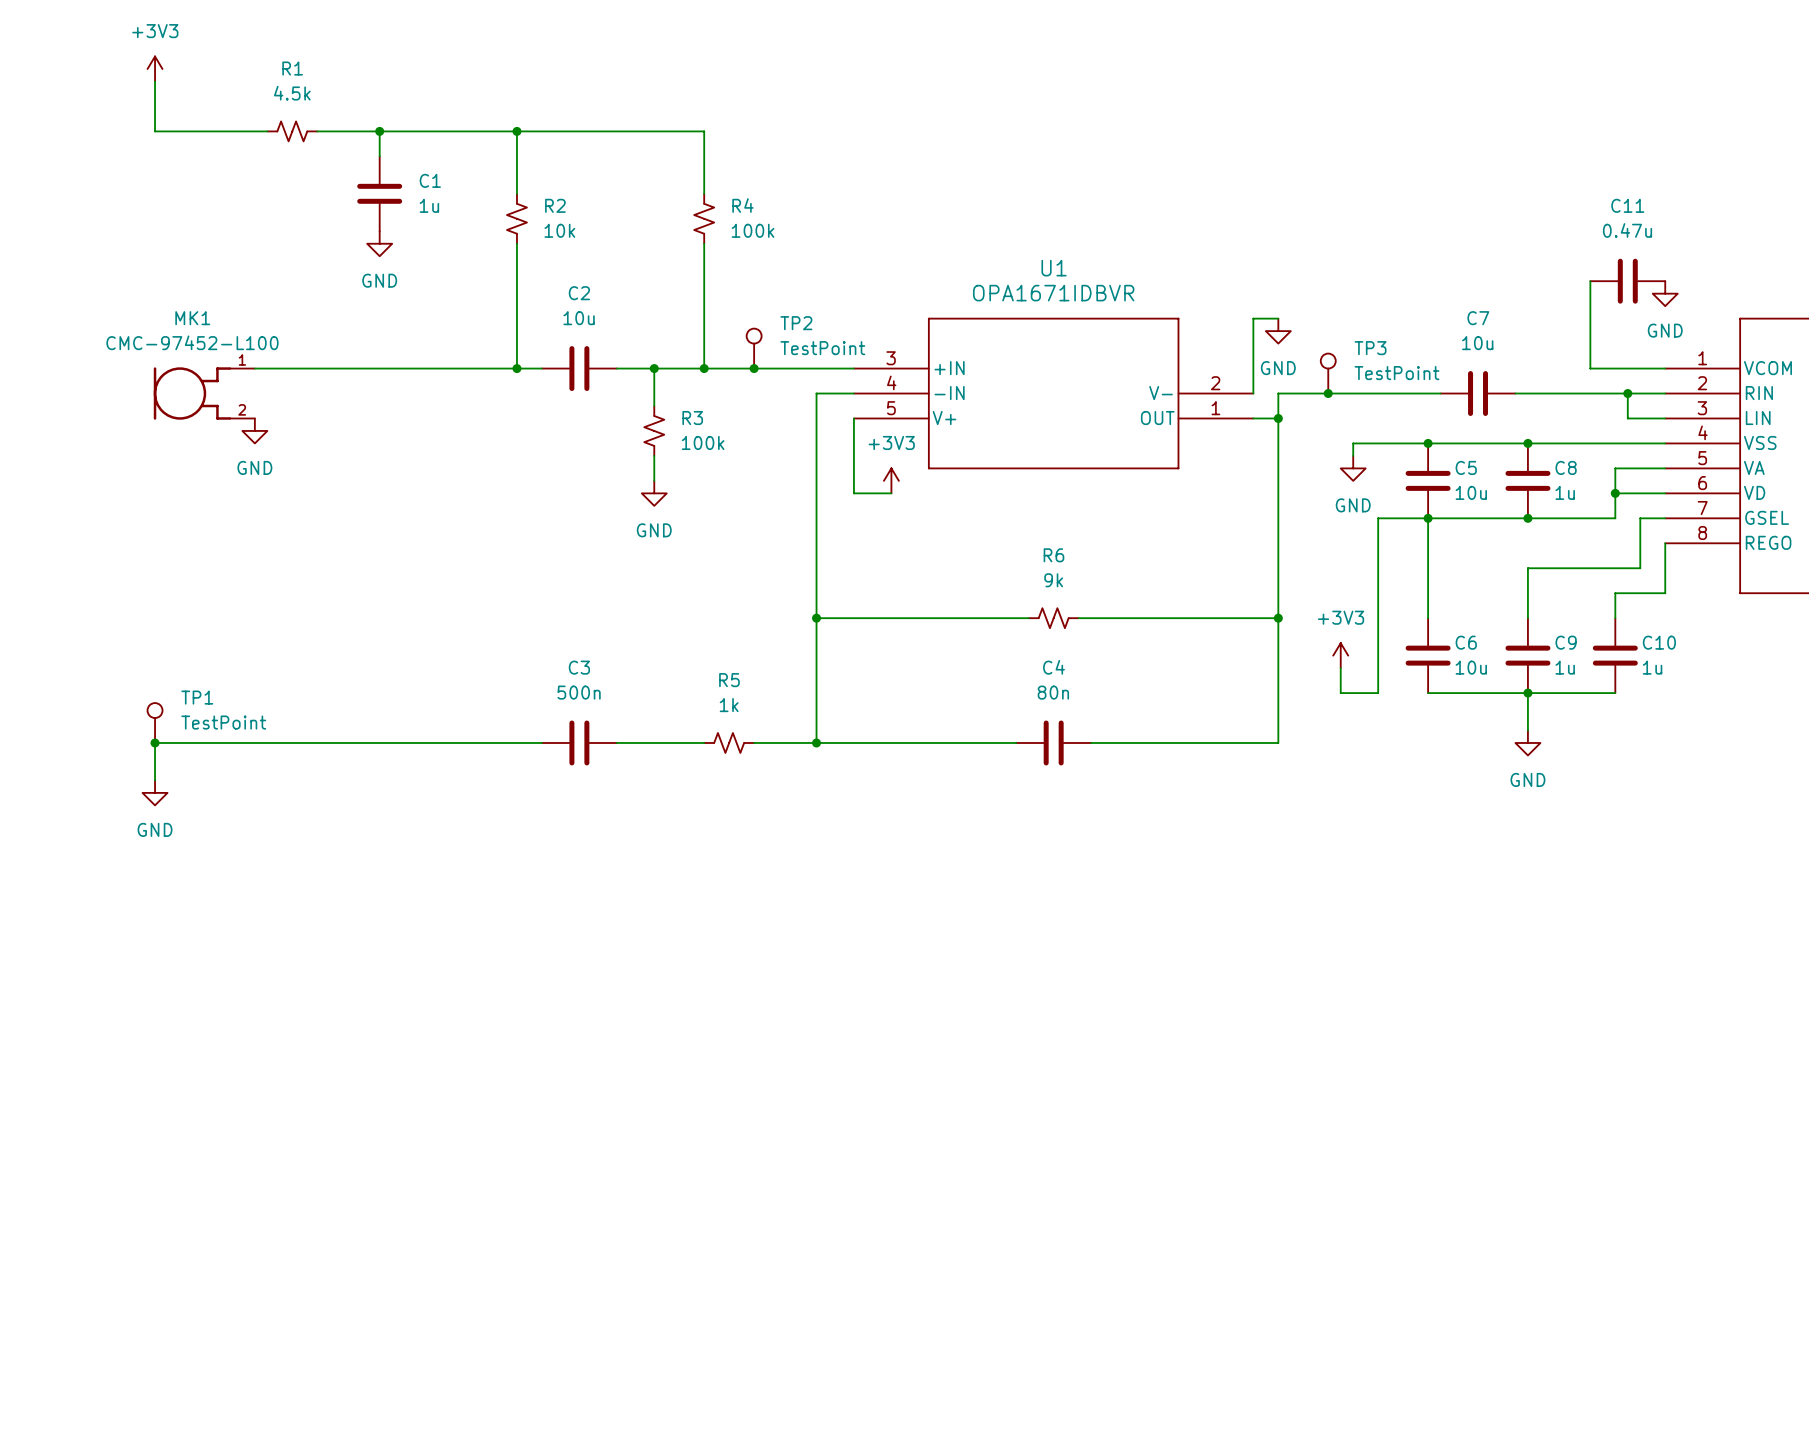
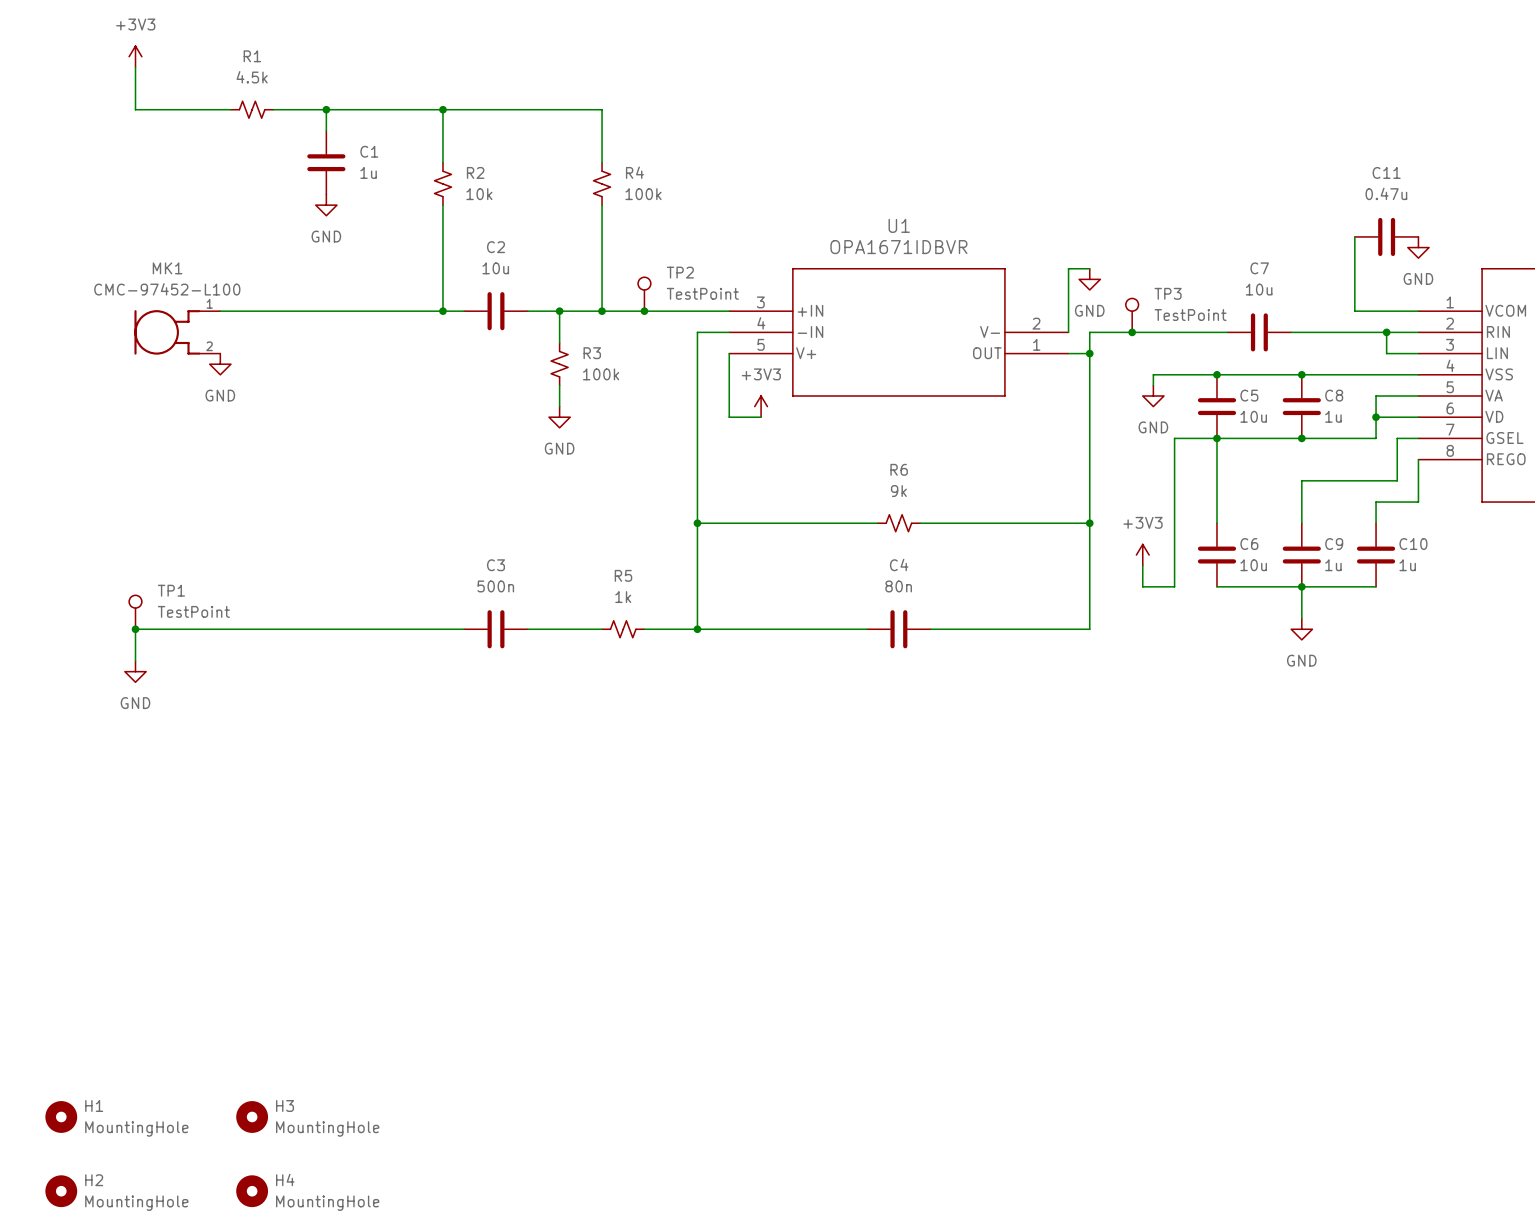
H1: none -> MountingHole (61, 1116)
H3: none -> MountingHole (252, 1116)
H2: none -> MountingHole (61, 1191)
H4: none -> MountingHole (252, 1191)

